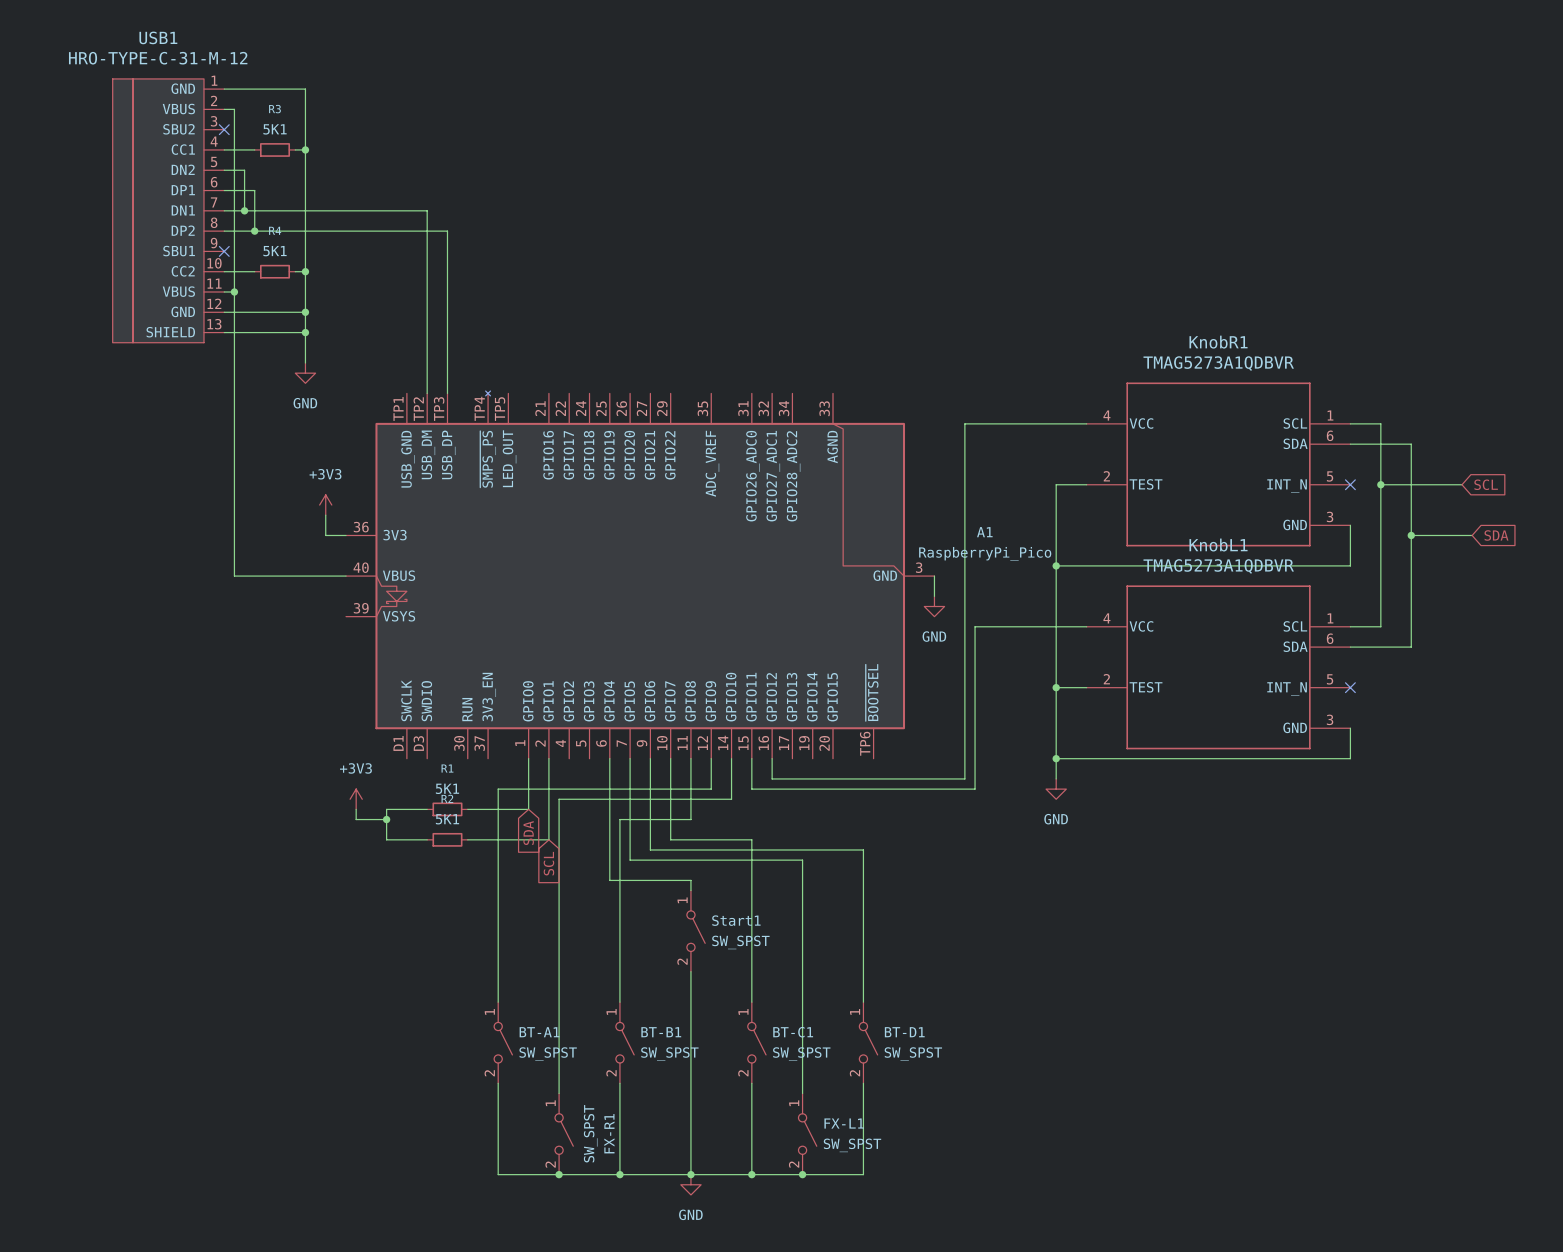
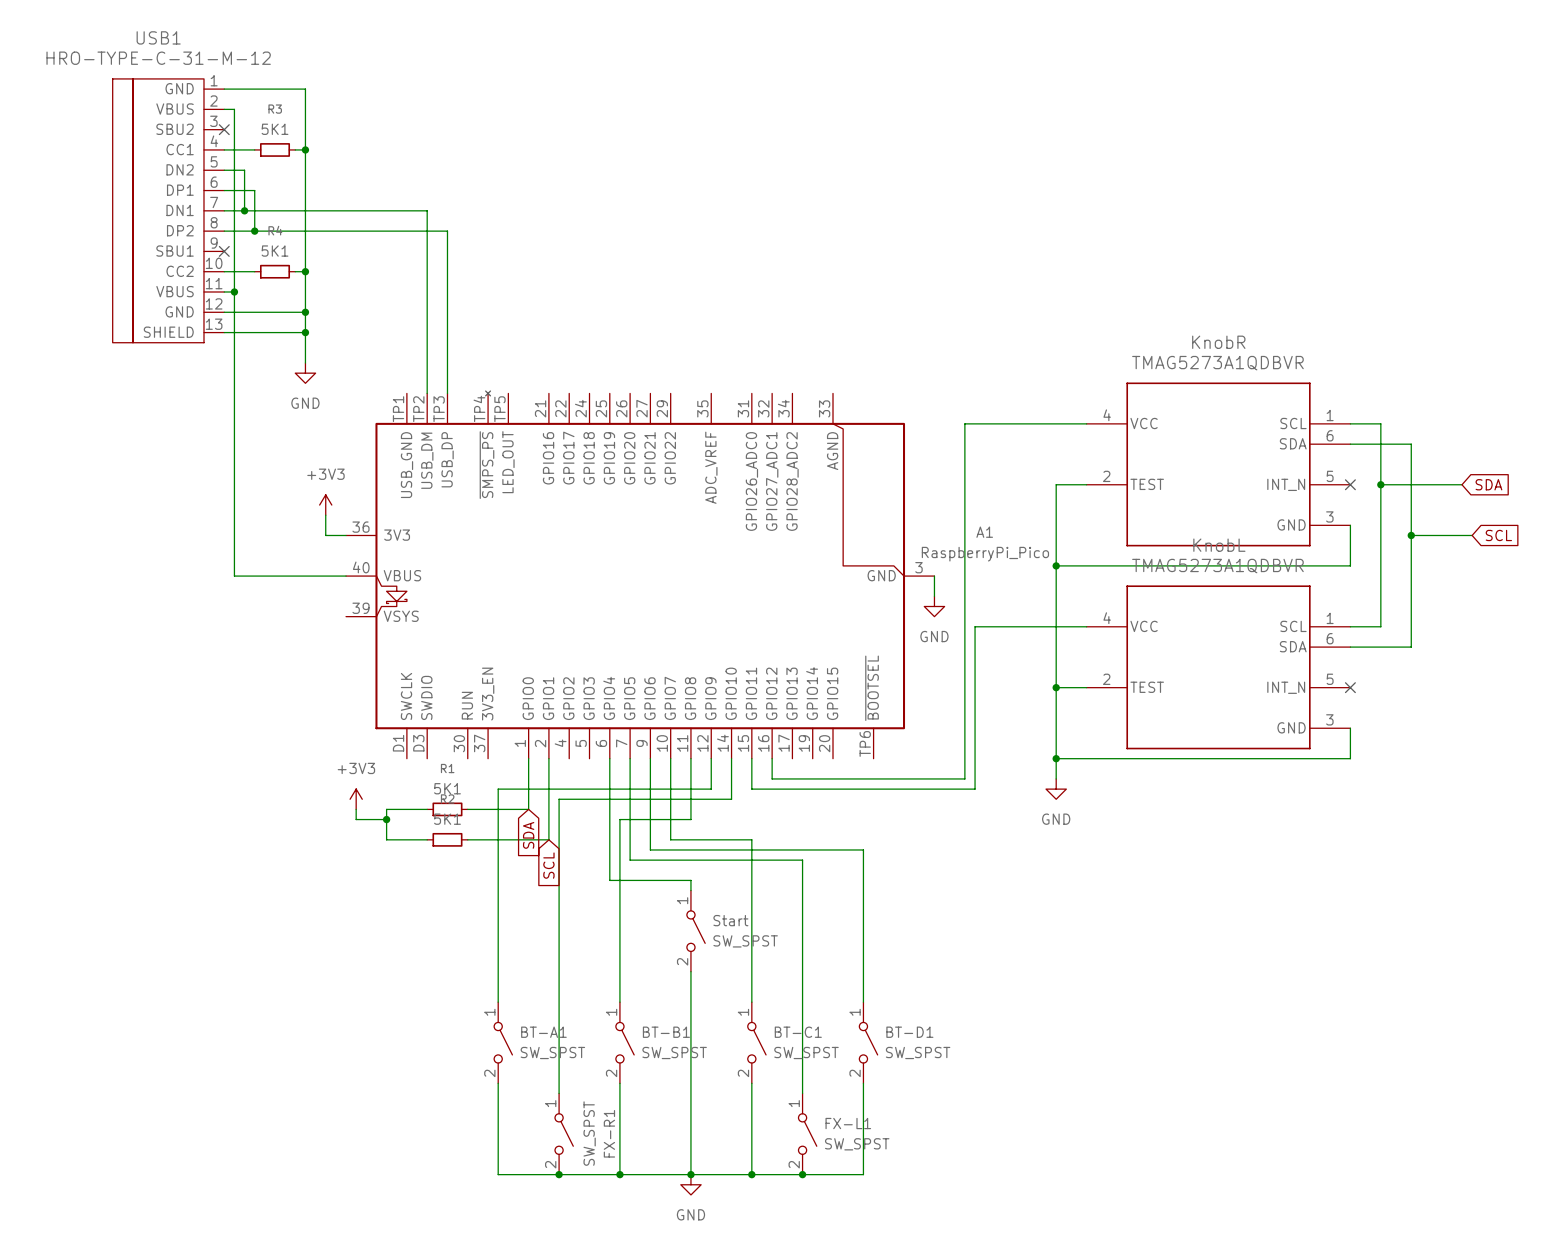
KnobR1 name: KnobR1 (1218, 342) -> KnobR (1218, 342)
global label: SCL (1486, 484) -> SDA (1488, 484)
global label: SDA (1496, 535) -> SCL (1498, 535)
KnobL1 name: KnobL1 (1218, 545) -> KnobL (1219, 545)
Start1 name: Start1 (736, 920) -> Start (730, 920)

